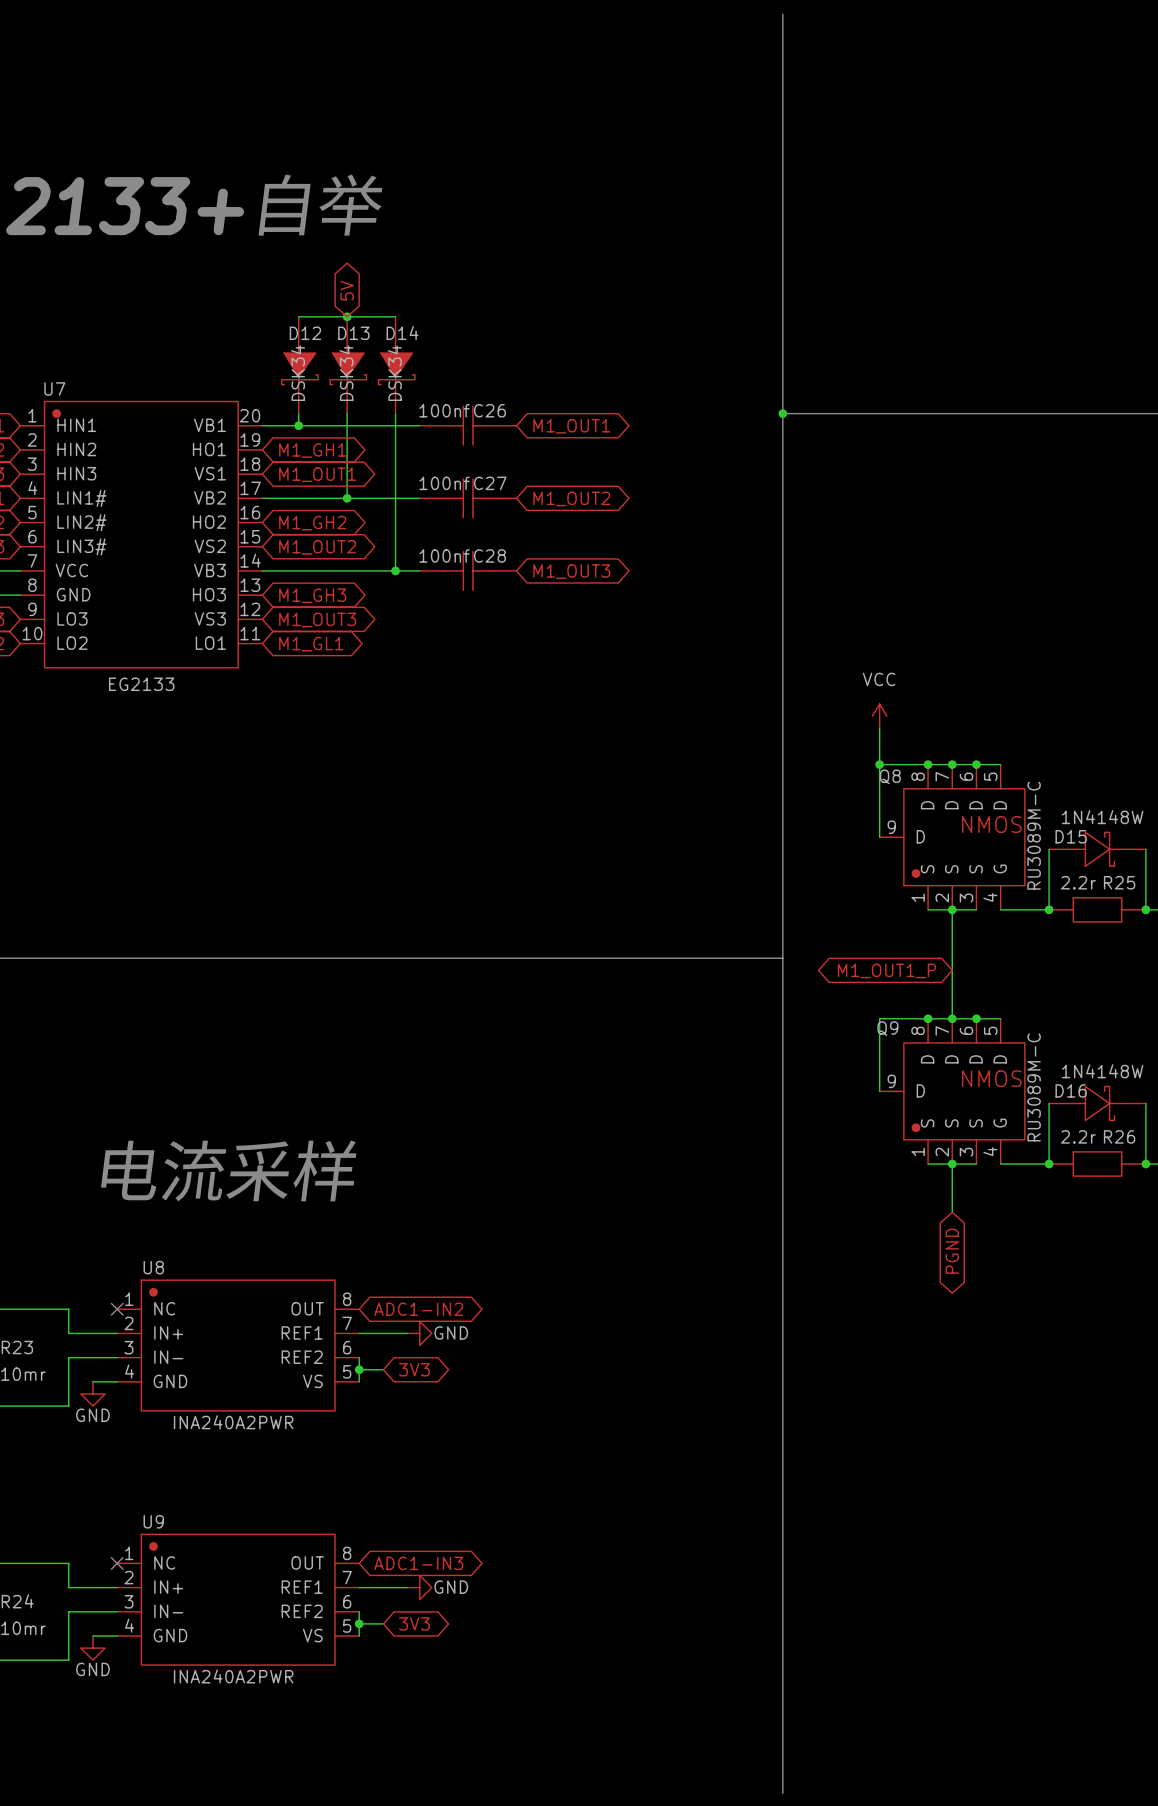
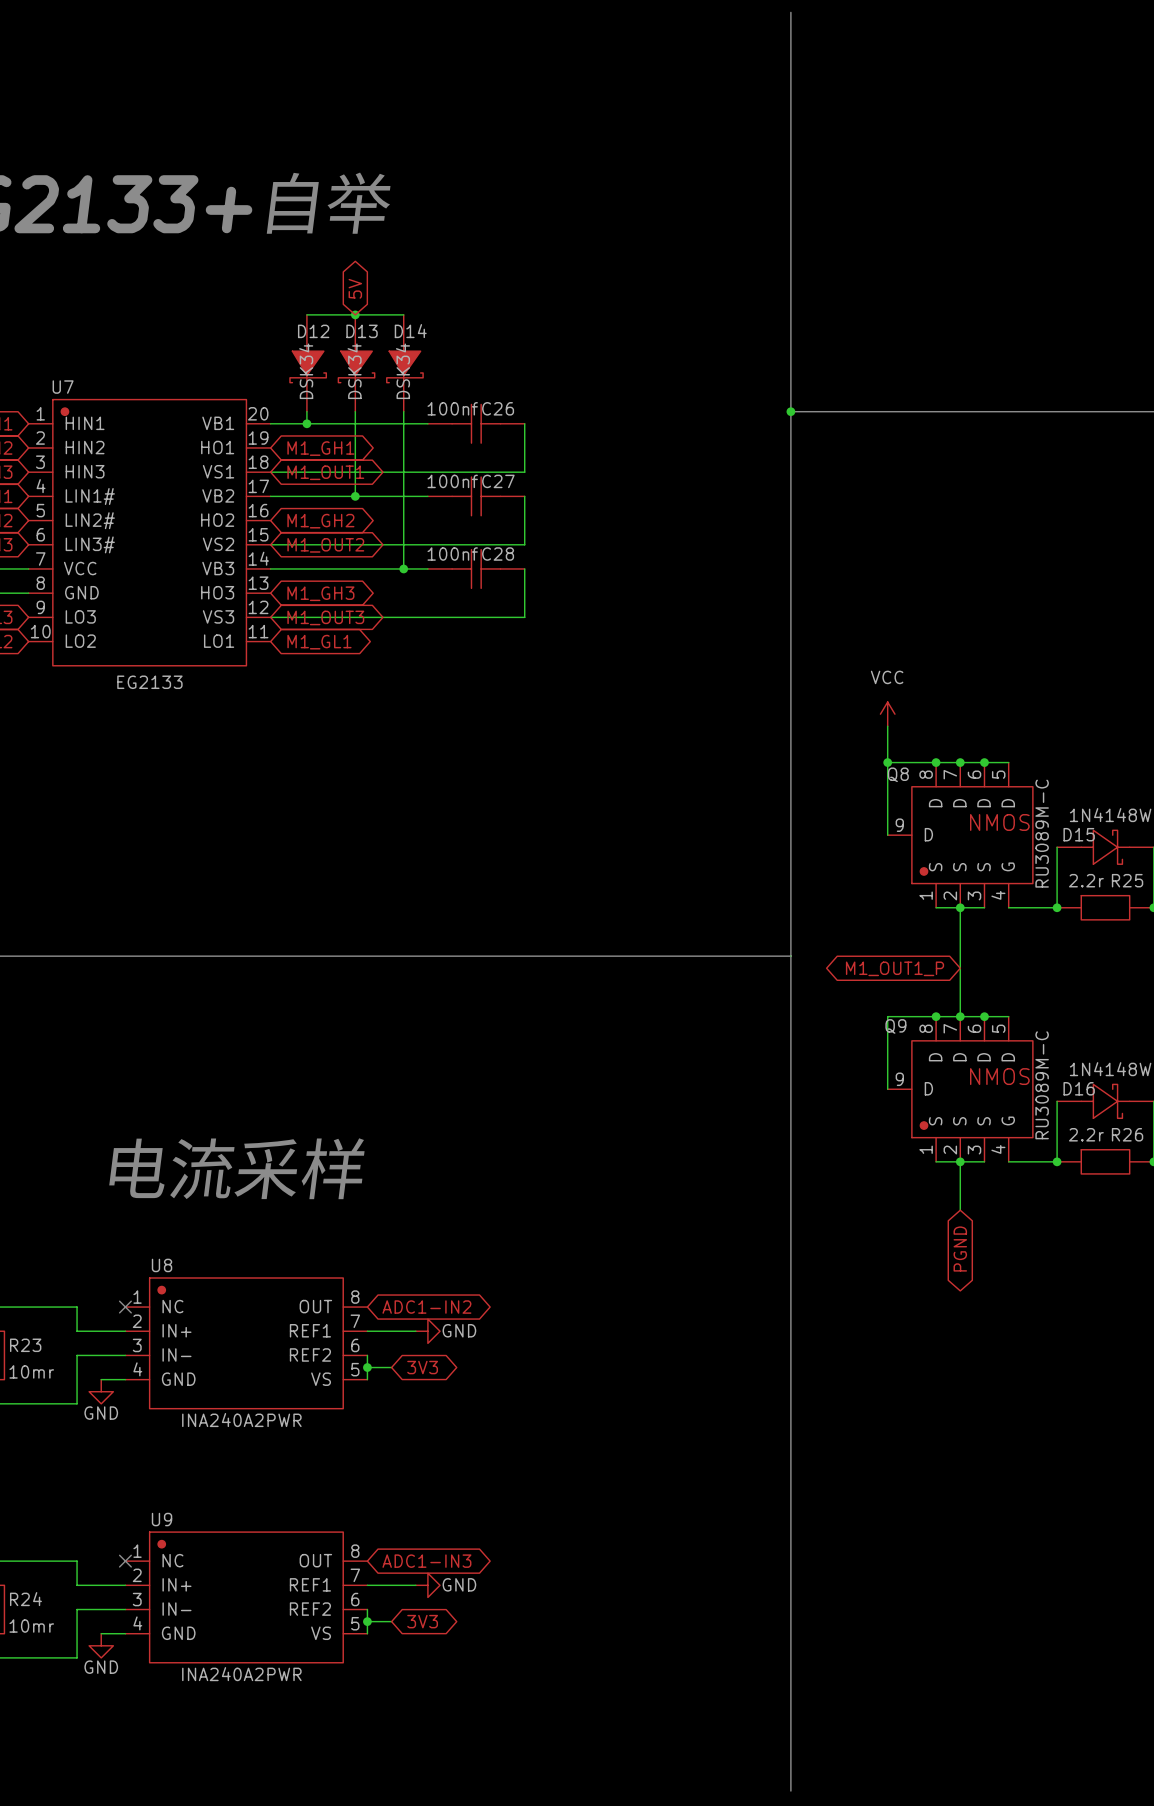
wire: none -> (524, 423) (524, 472) (270, 472)
global label: M1_OUT1 (571, 426) -> none
wire: none -> (524, 496) (524, 544) (270, 544)
global label: M1_OUT2 (571, 498) -> none
wire: none -> (524, 568) (524, 617) (270, 617)
global label: M1_OUT3 (571, 571) -> none

